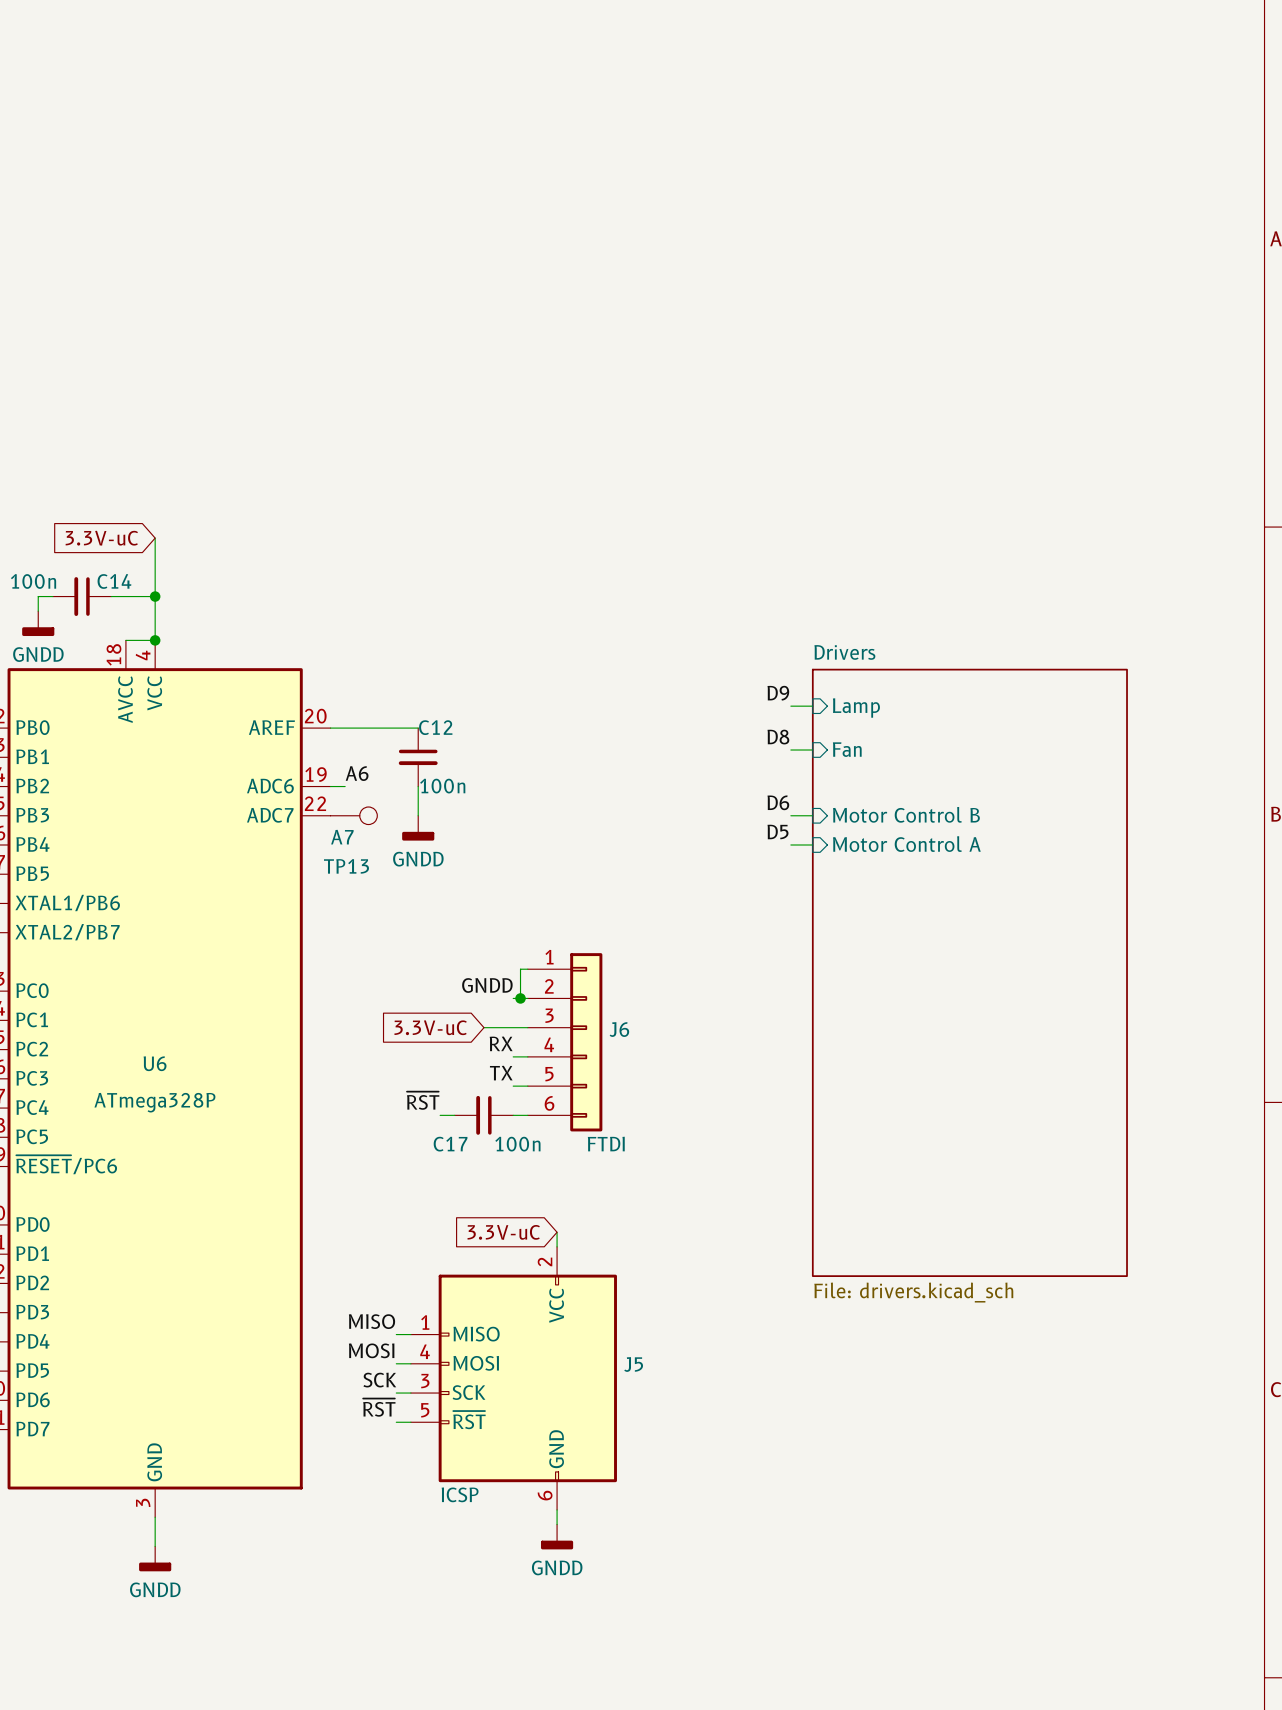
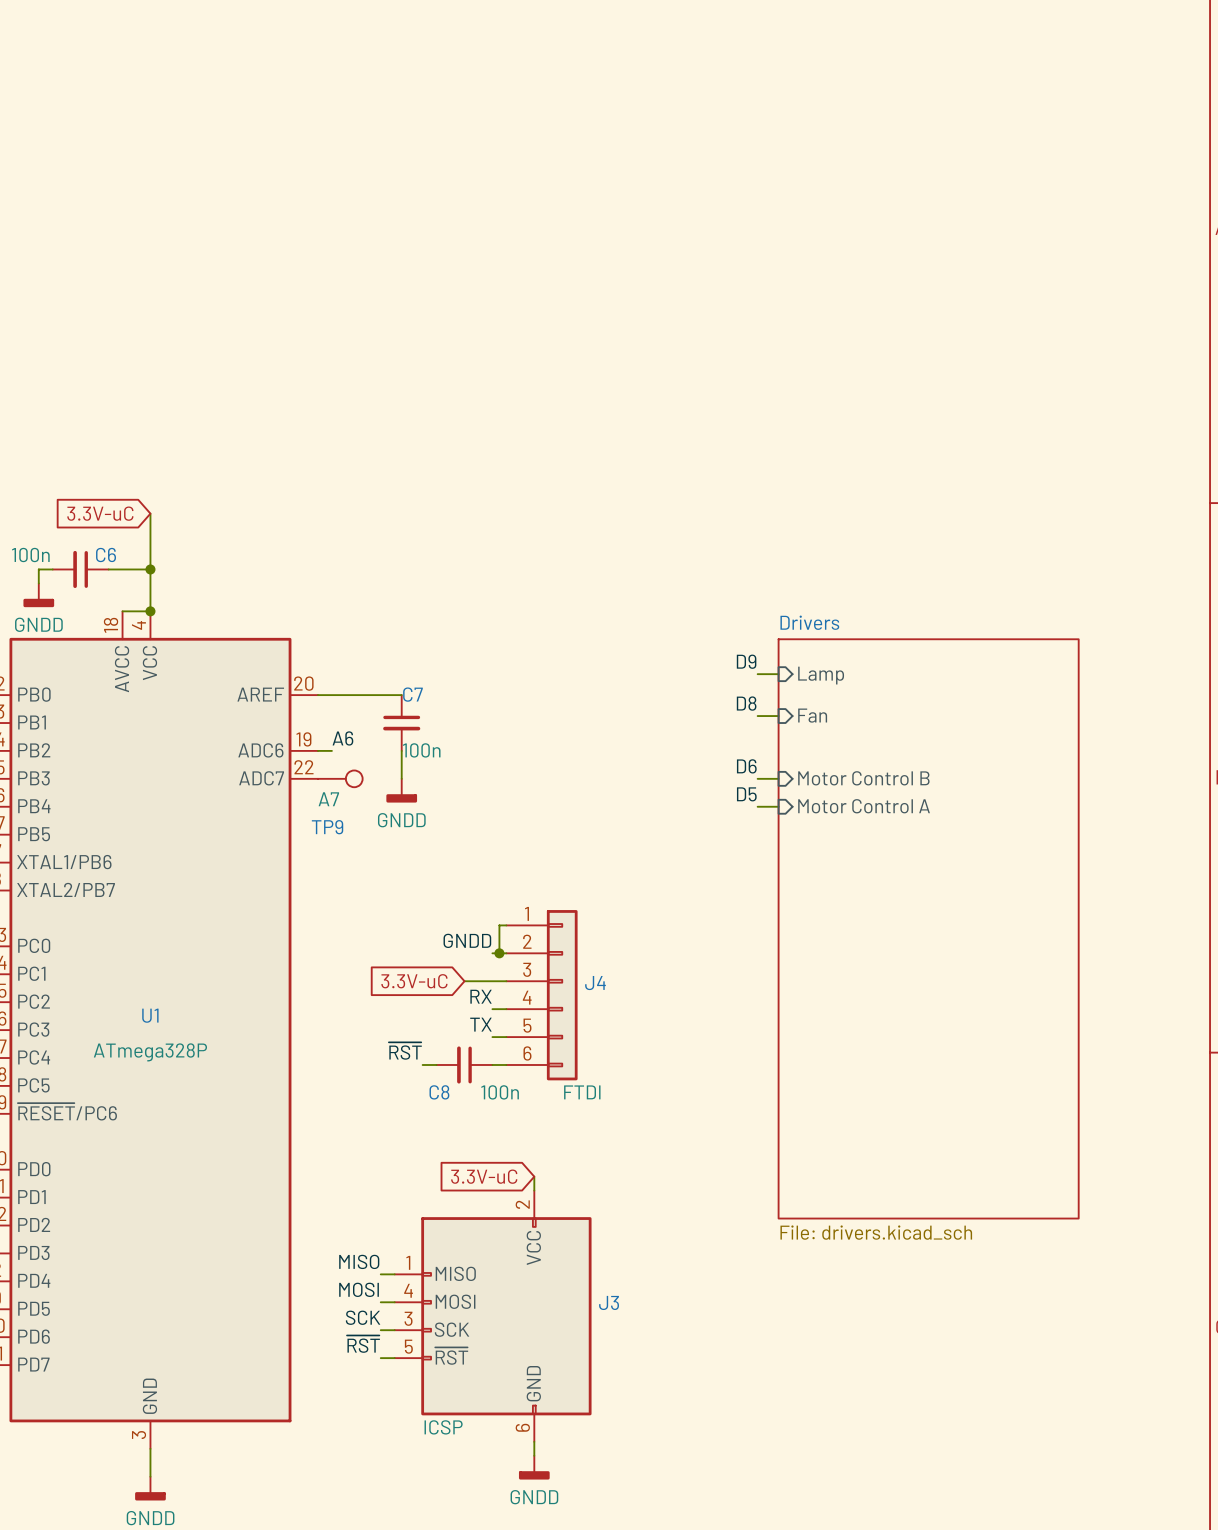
C14 name: C14 (114, 581) -> C6 (106, 555)
C12 name: C12 (435, 727) -> C7 (412, 694)
TP13 name: TP13 (346, 866) -> TP9 (327, 827)
J6 name: J6 (619, 1029) -> J4 (595, 983)
U6 name: U6 (155, 1063) -> U1 (150, 1015)
C17 name: C17 (450, 1144) -> C8 (439, 1092)
J5 name: J5 (633, 1364) -> J3 (609, 1302)

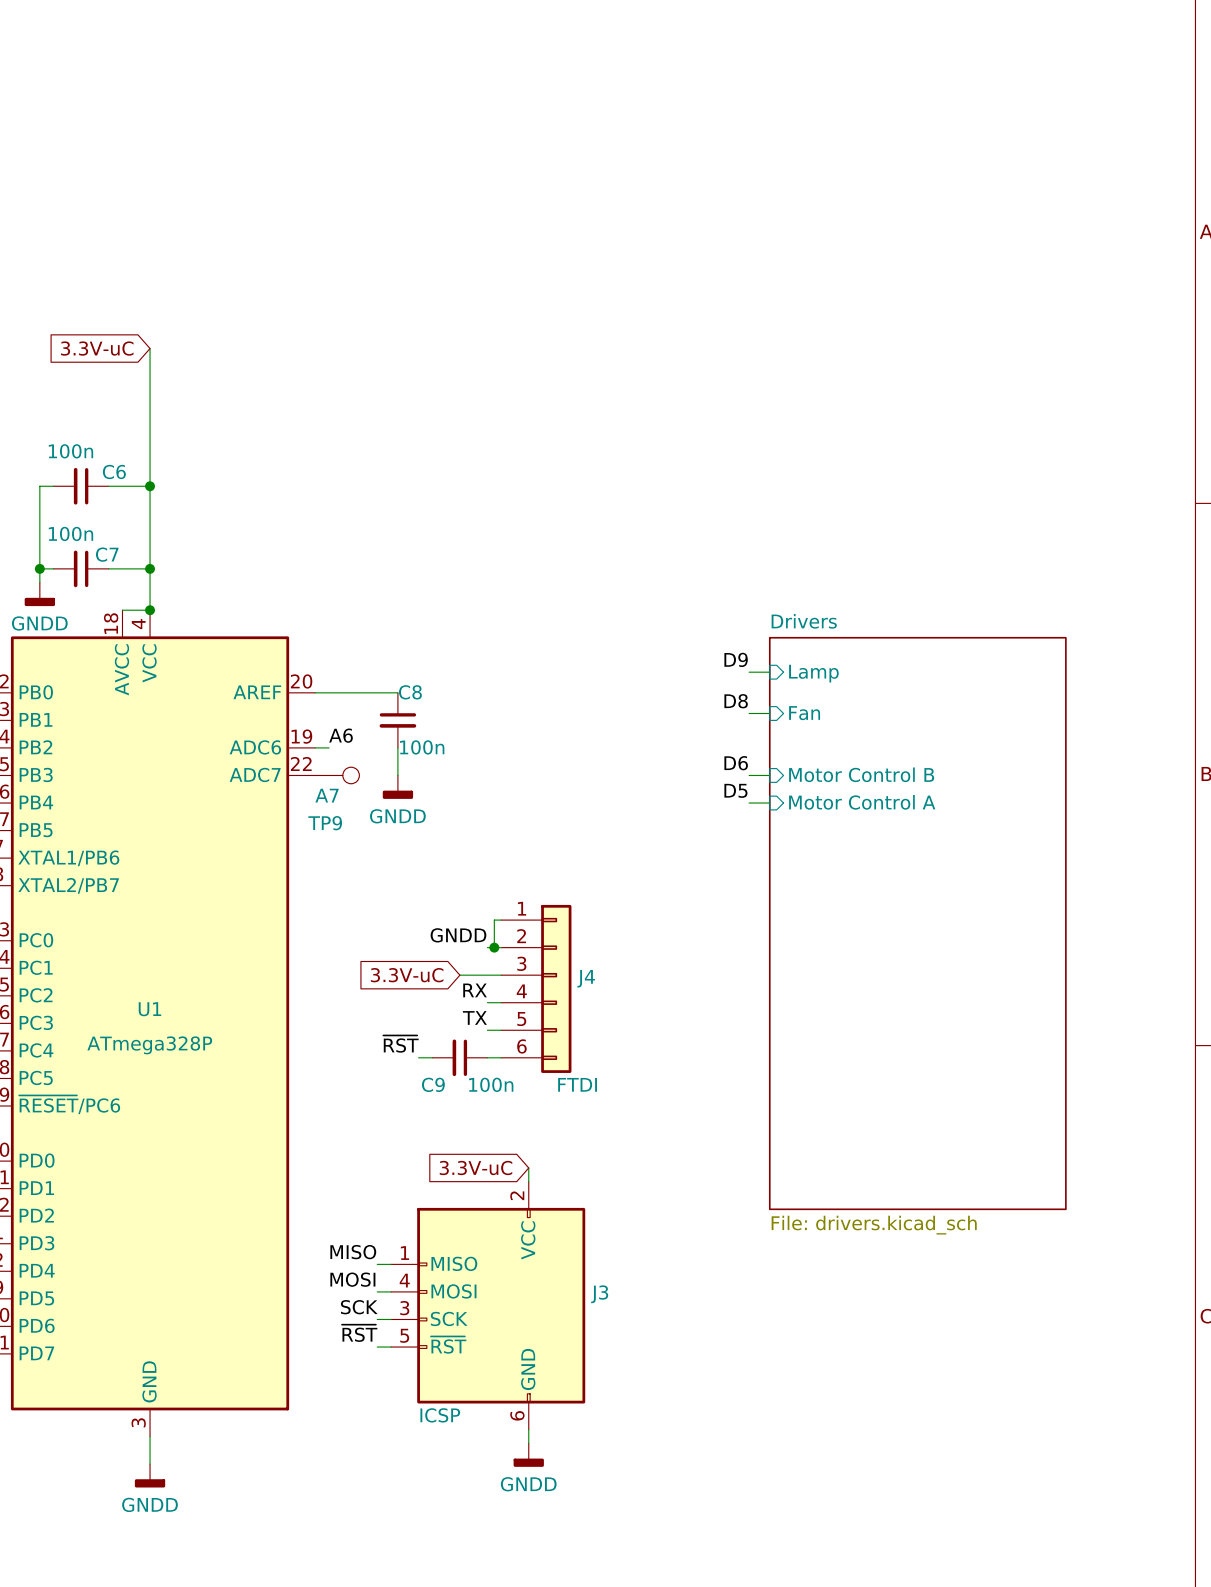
wire: none -> (150, 348) (150, 513)
wire: none -> (53, 486) (39, 486) (39, 568)
C6: none -> 100n (81, 486)
wire: none -> (108, 486) (150, 486)
junction: none -> (150, 486)
global label position: 3.3V-uC (100, 513) -> 3.3V-uC (97, 348)
C6 value position: 100n (30, 555) -> 100n (70, 533)
C6 name: C6 (106, 555) -> C7 (107, 554)
junction: none -> (39, 568)
C7 name: C7 (412, 694) -> C8 (410, 692)
C8 name: C8 (439, 1092) -> C9 (433, 1084)

